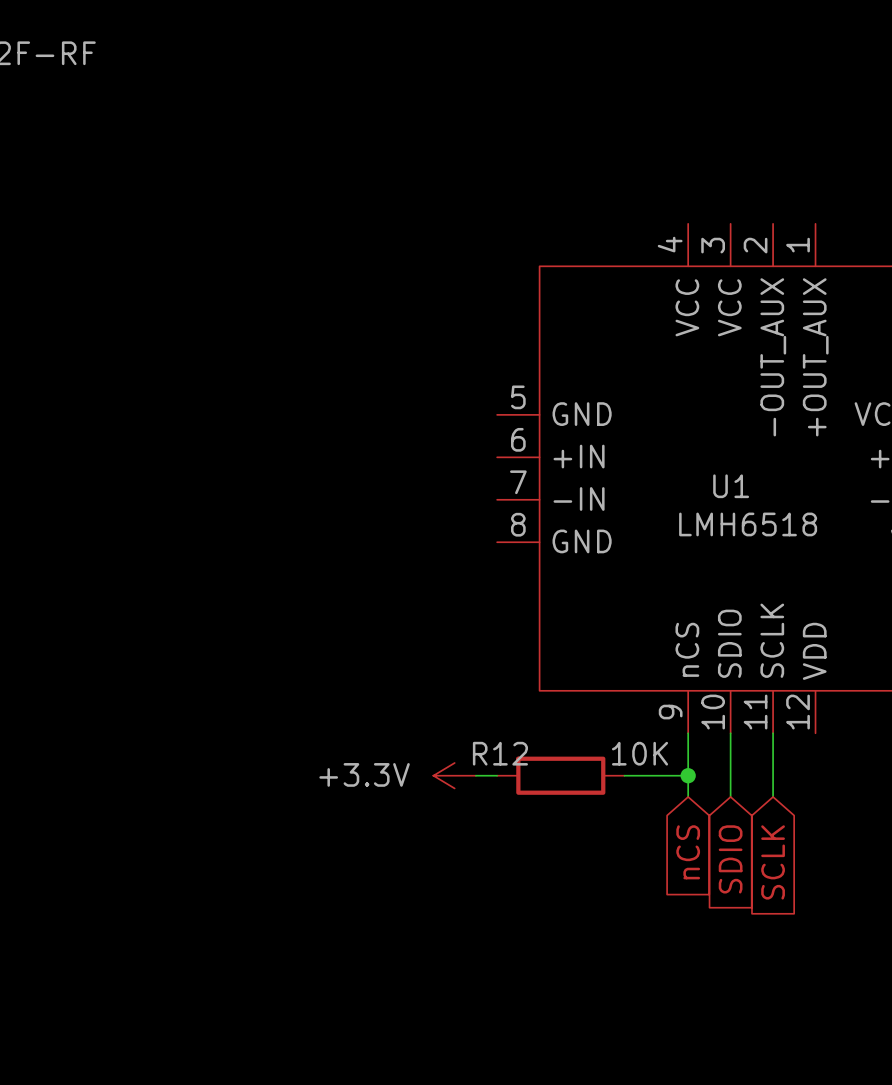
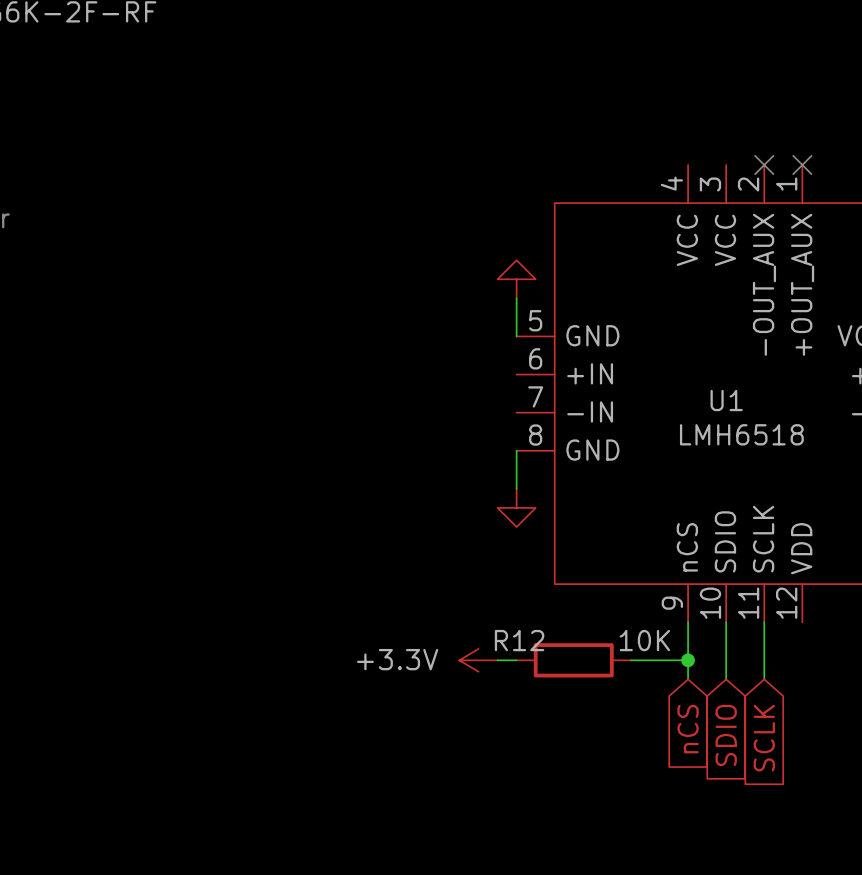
no-connect mark: none -> (764, 164)
no-connect mark: none -> (802, 164)
power symbol: none -> (516, 279)
wire: none -> (516, 298) (516, 336)
wire: none -> (516, 450) (516, 488)
power symbol: none -> (516, 507)

